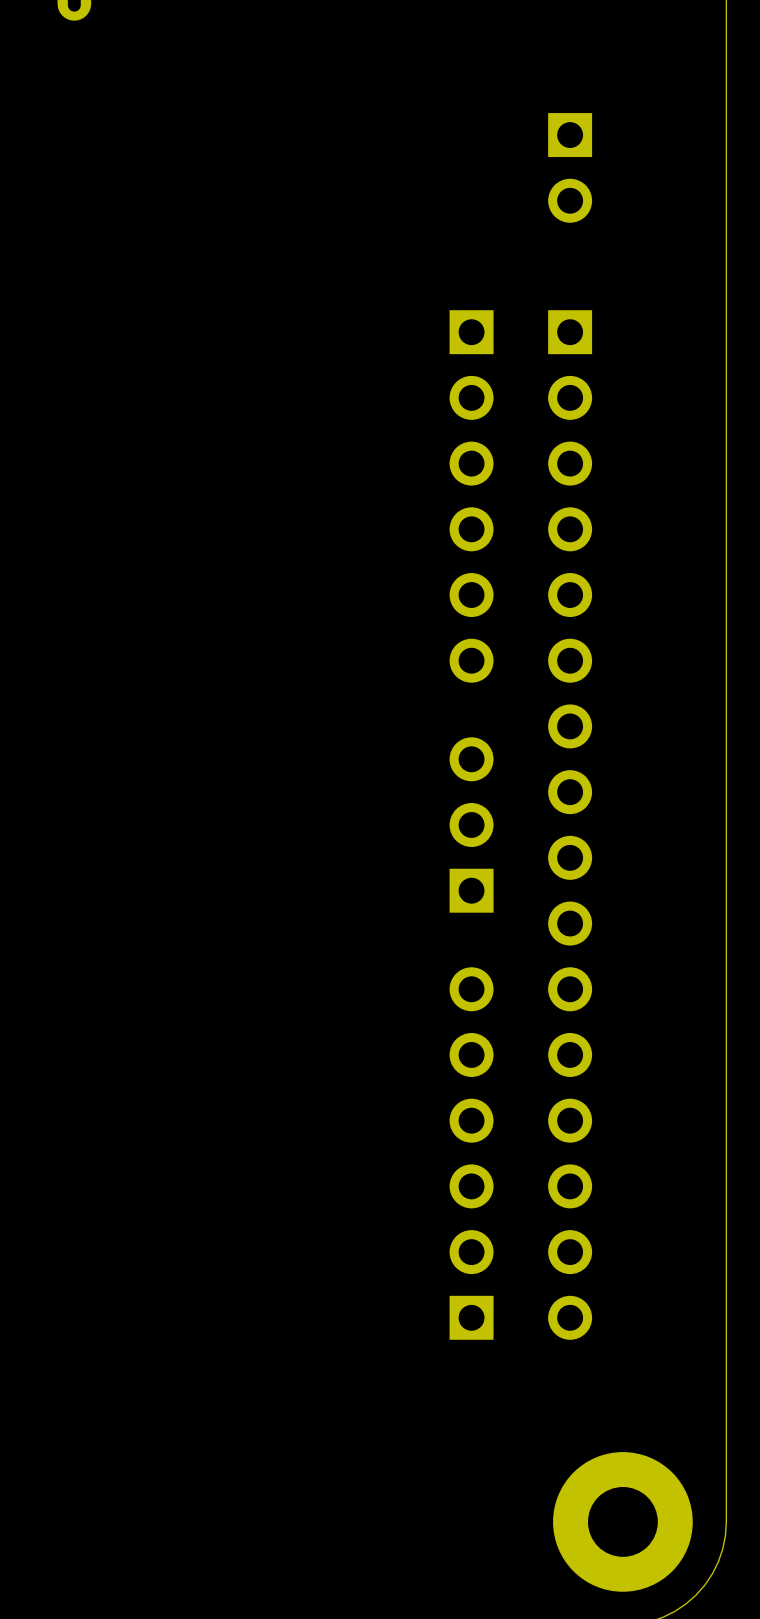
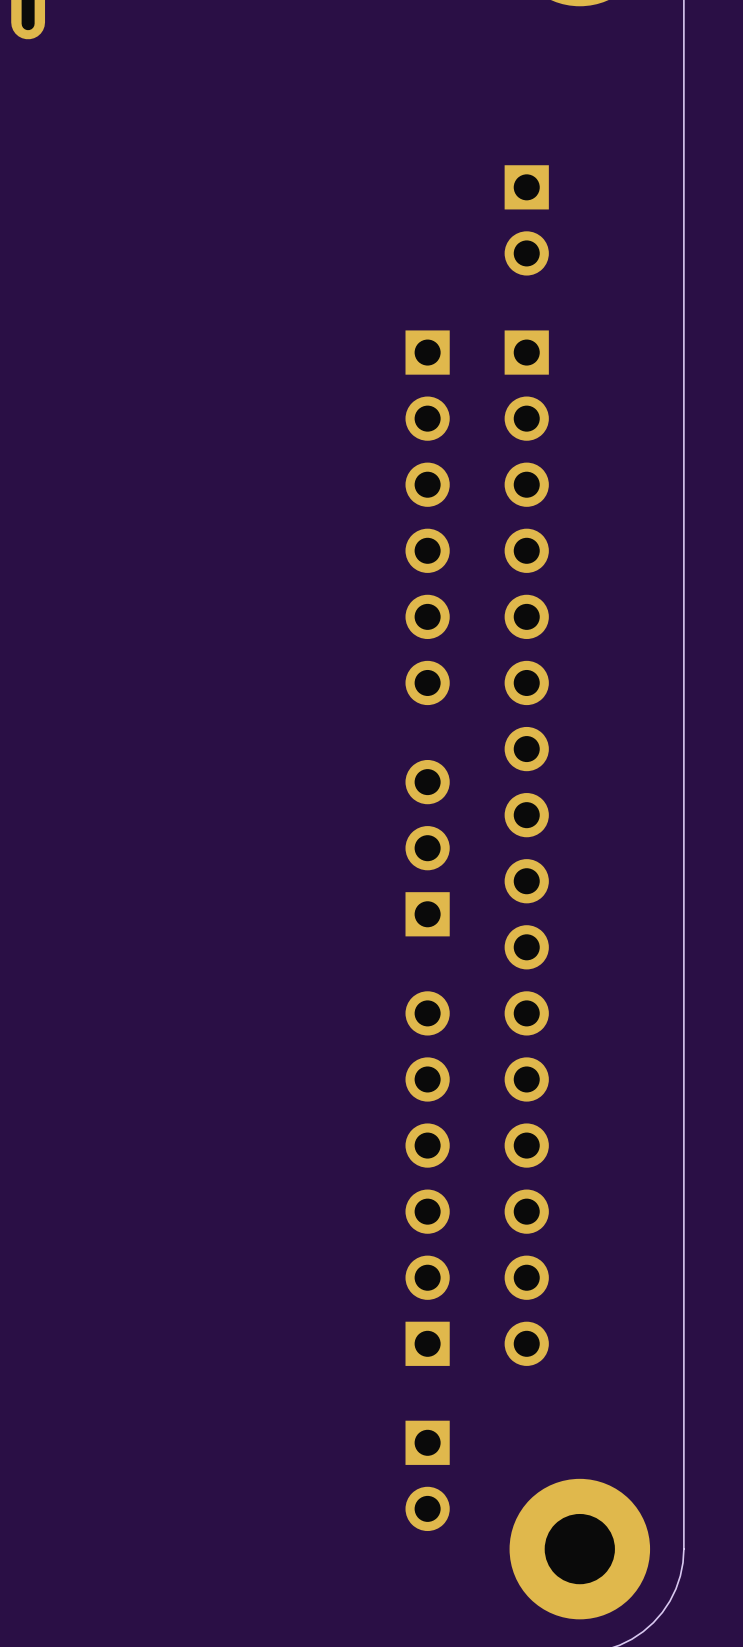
part position: (570, 167) -> (526, 220)
part: none -> (427, 1475)

